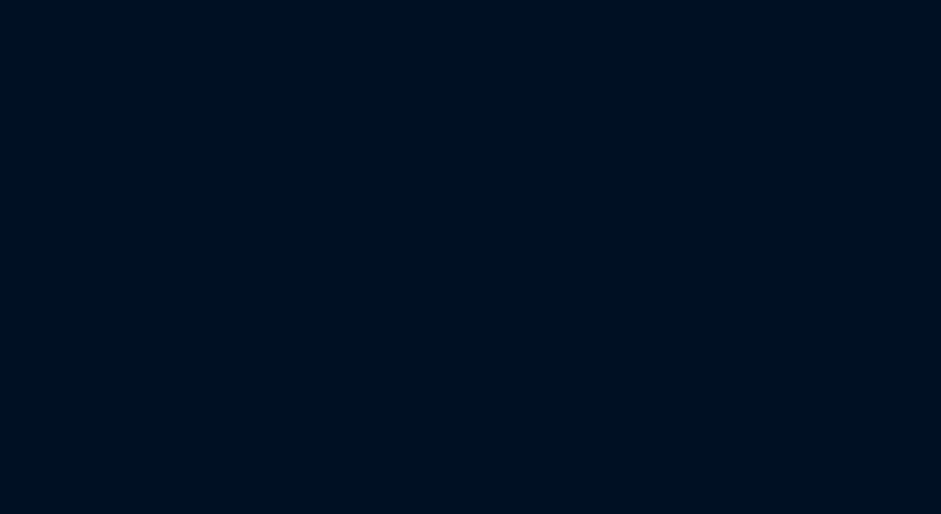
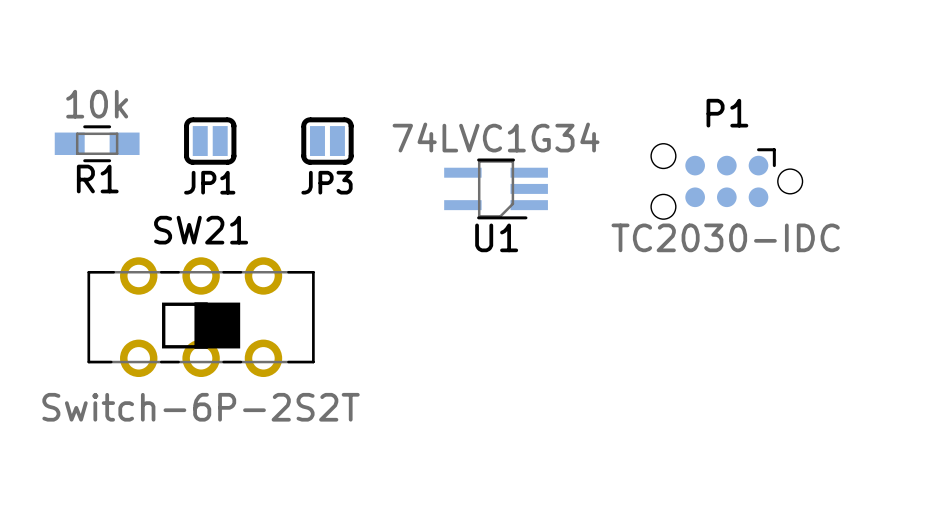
JP1: none -> (210, 141)
JP3: none -> (327, 141)
R1: none -> 10k (97, 143)
P1: none -> TC2030-IDC (726, 181)
U1: none -> 74LVC1G34 (496, 188)
SW21: none -> Switch-6P-2S2T (201, 317)

